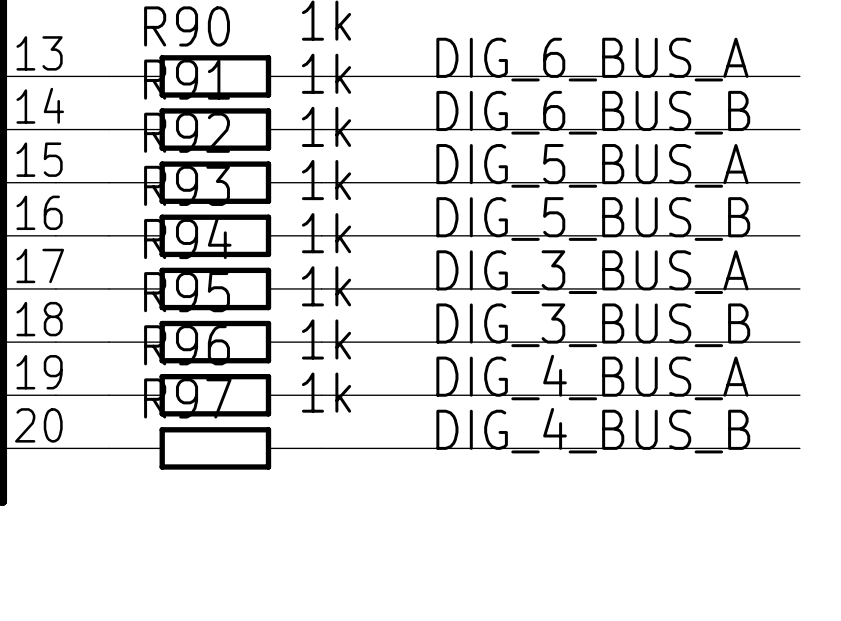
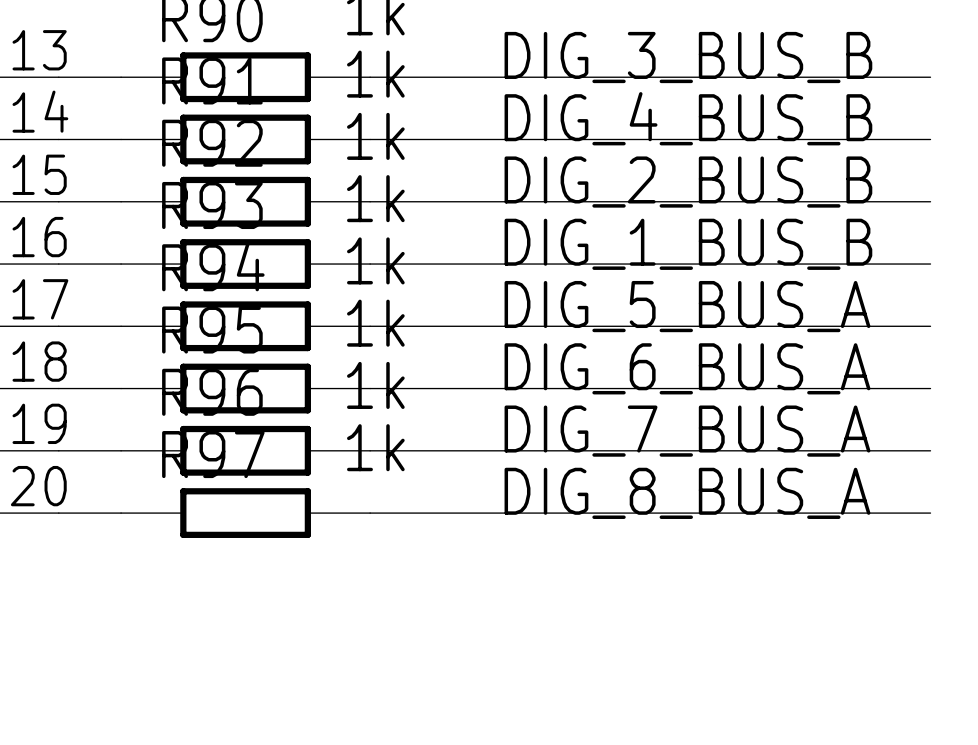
label: DIG_6_BUS_A (592, 59) -> DIG_3_BUS_B (688, 57)
label: DIG_6_BUS_B (593, 112) -> DIG_4_BUS_B (688, 118)
label: DIG_5_BUS_A (592, 165) -> DIG_2_BUS_B (688, 182)
label: DIG_5_BUS_B (593, 219) -> DIG_1_BUS_B (688, 244)
label: DIG_3_BUS_A (592, 272) -> DIG_5_BUS_A (687, 306)
label: DIG_3_BUS_B (593, 325) -> DIG_6_BUS_A (687, 368)
label: DIG_4_BUS_A (592, 377) -> DIG_7_BUS_A (687, 431)
label: DIG_4_BUS_B (593, 430) -> DIG_8_BUS_A (687, 493)

